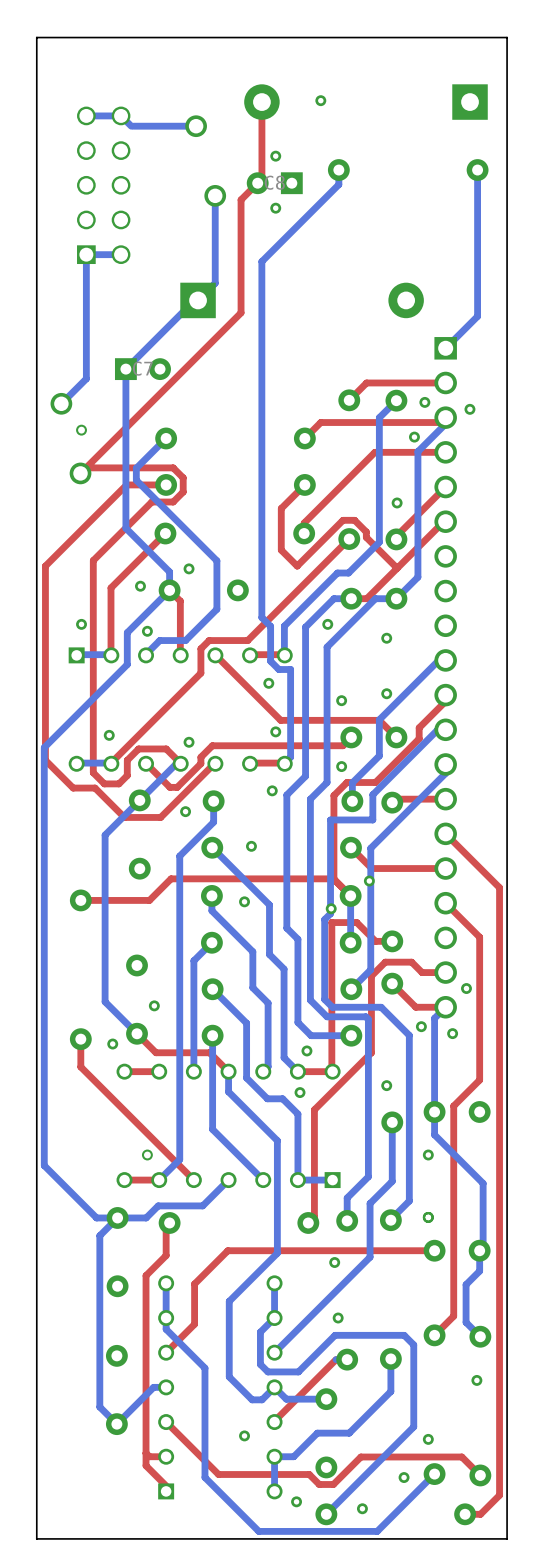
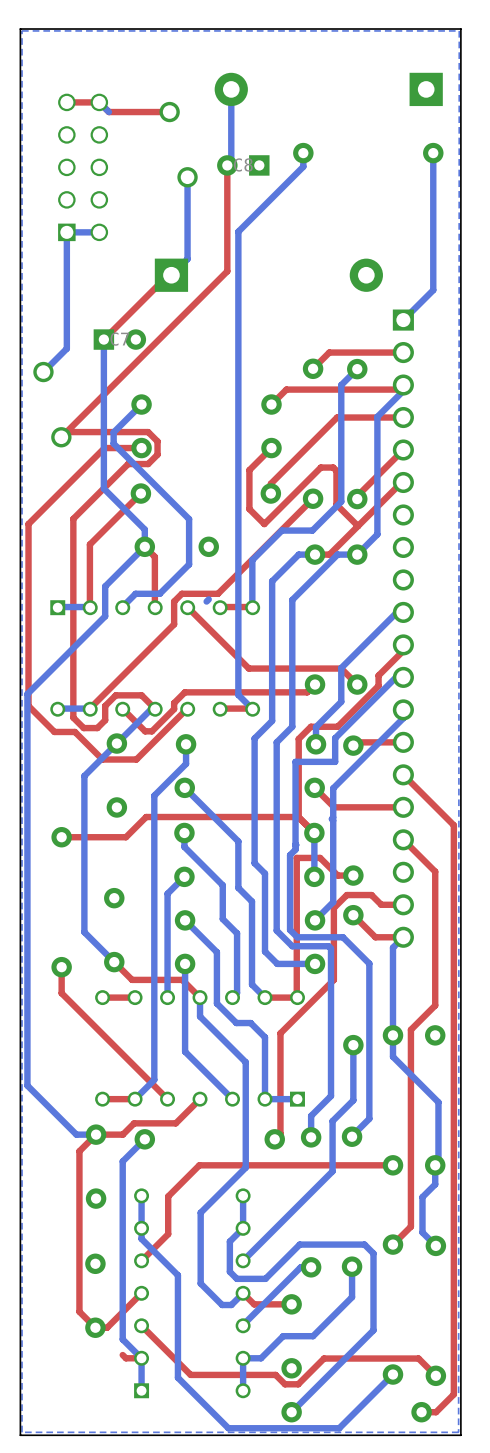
bottom zone outline: none -> (459, 30) (22, 30) (22, 1432) (458, 1432) (459, 30)
via: (320, 100) -> none
top track: (261, 102) (261, 178) -> none
bottom track: none -> (231, 89) (231, 161) (227, 165)
top track: none -> (66, 102) (99, 102) (108, 112) (169, 112)
bottom track: (123, 115) (88, 115) -> none
bottom track: (198, 126) (133, 126) -> none
via: (275, 156) -> none
top track: (257, 183) (241, 199) (241, 312) -> (227, 165) (227, 271) (211, 286)
via: (275, 208) -> none
bottom track: (269, 253) (261, 261) (261, 617) (270, 626) (270, 661) (278, 669) (290, 669) (290, 757) (284, 763) -> (238, 231) (238, 694) (252, 708)
bottom track: (194, 300) (125, 369) -> none
top track: none -> (171, 275) (168, 275) (103, 339)
via: (424, 402) -> none
via: (469, 409) -> none
via: (81, 430) -> none
via: (414, 437) -> none
via: (397, 502) -> none
top track: (343, 520) (354, 520) (366, 531) (366, 537) (374, 545) -> (307, 481) (320, 467) (333, 467) (336, 470) (336, 504)
via: (189, 568) -> none
bottom track: (337, 573) (284, 626) -> (302, 530) (281, 530) (252, 560) (252, 580)
via: (140, 586) -> none
via: (81, 624) -> none
via: (327, 624) -> none
via: (147, 631) -> none
via: (386, 638) -> none
bottom track: none -> (208, 599) (206, 601)
via: (268, 683) -> none
via: (386, 693) -> none
via: (341, 700) -> none
via: (275, 731) -> none
via: (109, 735) -> none
via: (189, 742) -> none
via: (341, 766) -> none
via: (272, 790) -> none
via: (185, 811) -> none
via: (251, 846) -> none
via: (369, 881) -> none
via: (244, 901) -> none
via: (331, 908) -> none
via: (466, 988) -> none
via: (154, 1005) -> none
via: (421, 1026) -> none
via: (452, 1033) -> none
via: (112, 1044) -> none
via: (306, 1050) -> none
via: (386, 1085) -> none
via: (300, 1092) -> none
via: (147, 1155) -> none
via: (428, 1155) -> none
top track: none -> (200, 1099) (175, 1123) (134, 1123) (122, 1134) (96, 1134) (79, 1151) (79, 1311) (95, 1327) (107, 1327) (141, 1293)
bottom track: (228, 1180) (202, 1205) (158, 1205) (146, 1217) (117, 1217) (99, 1235) (99, 1407) (116, 1424) -> none
via: (428, 1217) -> none
top track: (166, 1220) (166, 1255) (146, 1275) (146, 1465) (169, 1489) -> none
bottom track: none -> (144, 1139) (122, 1161) (122, 1339) (141, 1358) (141, 1390)
via: (334, 1262) -> none
via: (338, 1318) -> none
top track: (336, 1359) (274, 1421) -> none
bottom track: none -> (300, 1267) (243, 1324)
via: (476, 1380) -> none
bottom track: (166, 1387) (153, 1387) (119, 1422) -> none
top track: none -> (243, 1293) (254, 1304) (291, 1304)
bottom track: (274, 1387) (286, 1399) (326, 1399) -> none
via: (244, 1435) -> none
via: (428, 1439) -> none
via: (404, 1477) -> none
via: (296, 1501) -> none
via: (362, 1508) -> none

